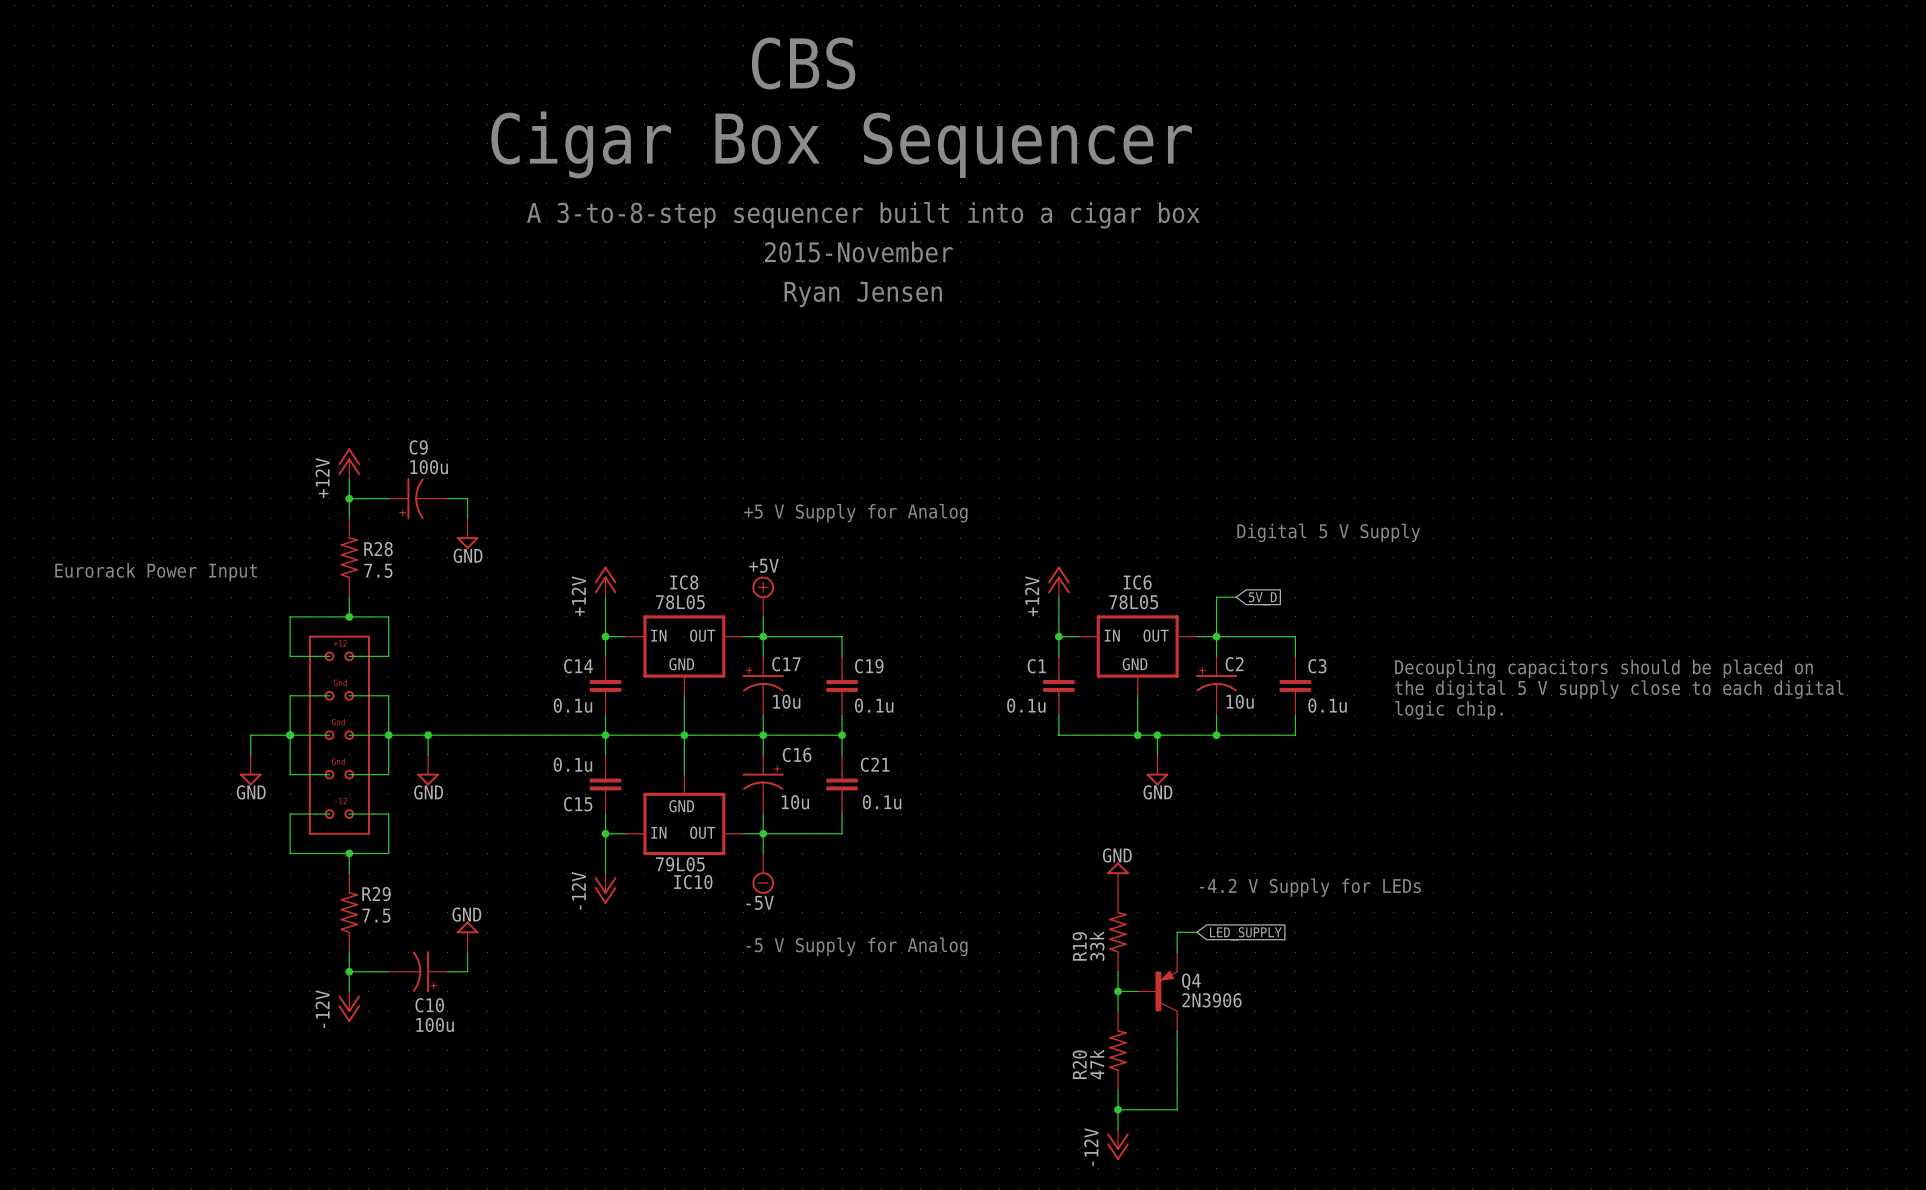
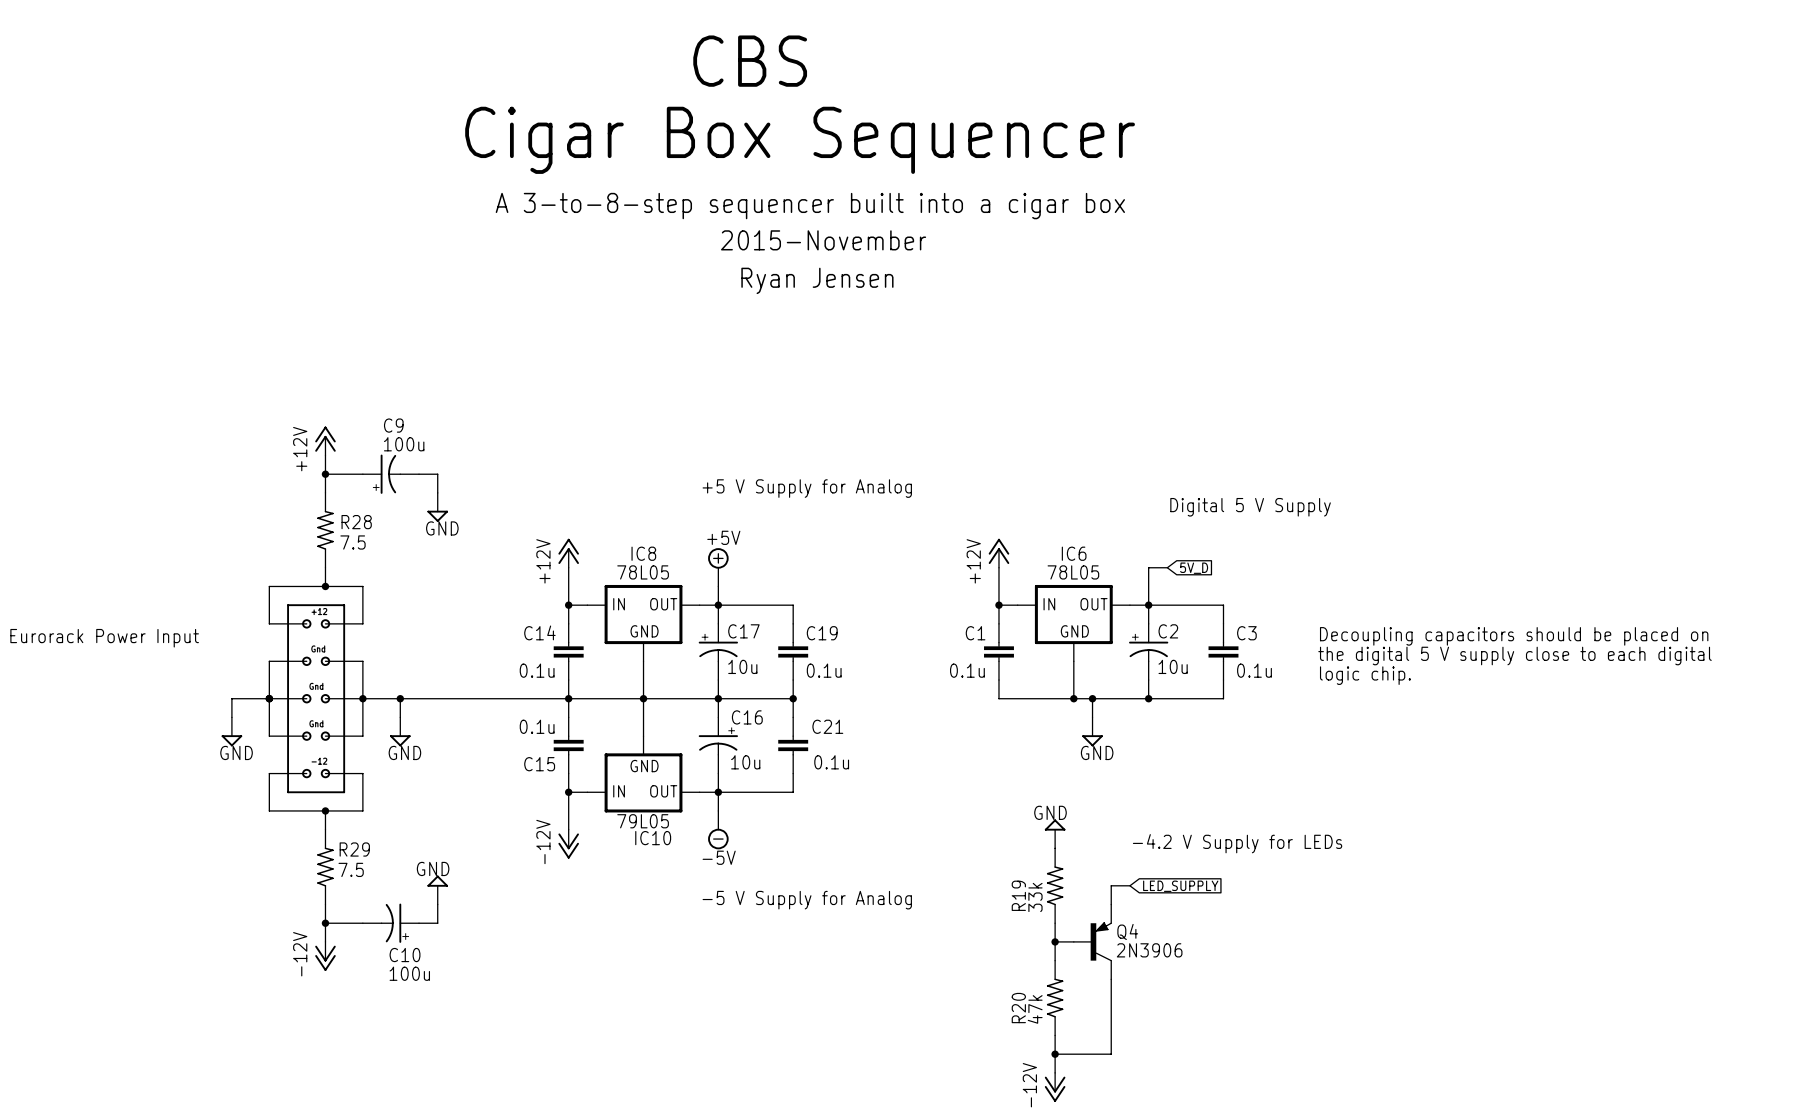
text position: Eurorack Power Input (156, 572) -> Eurorack Power Input (104, 638)

